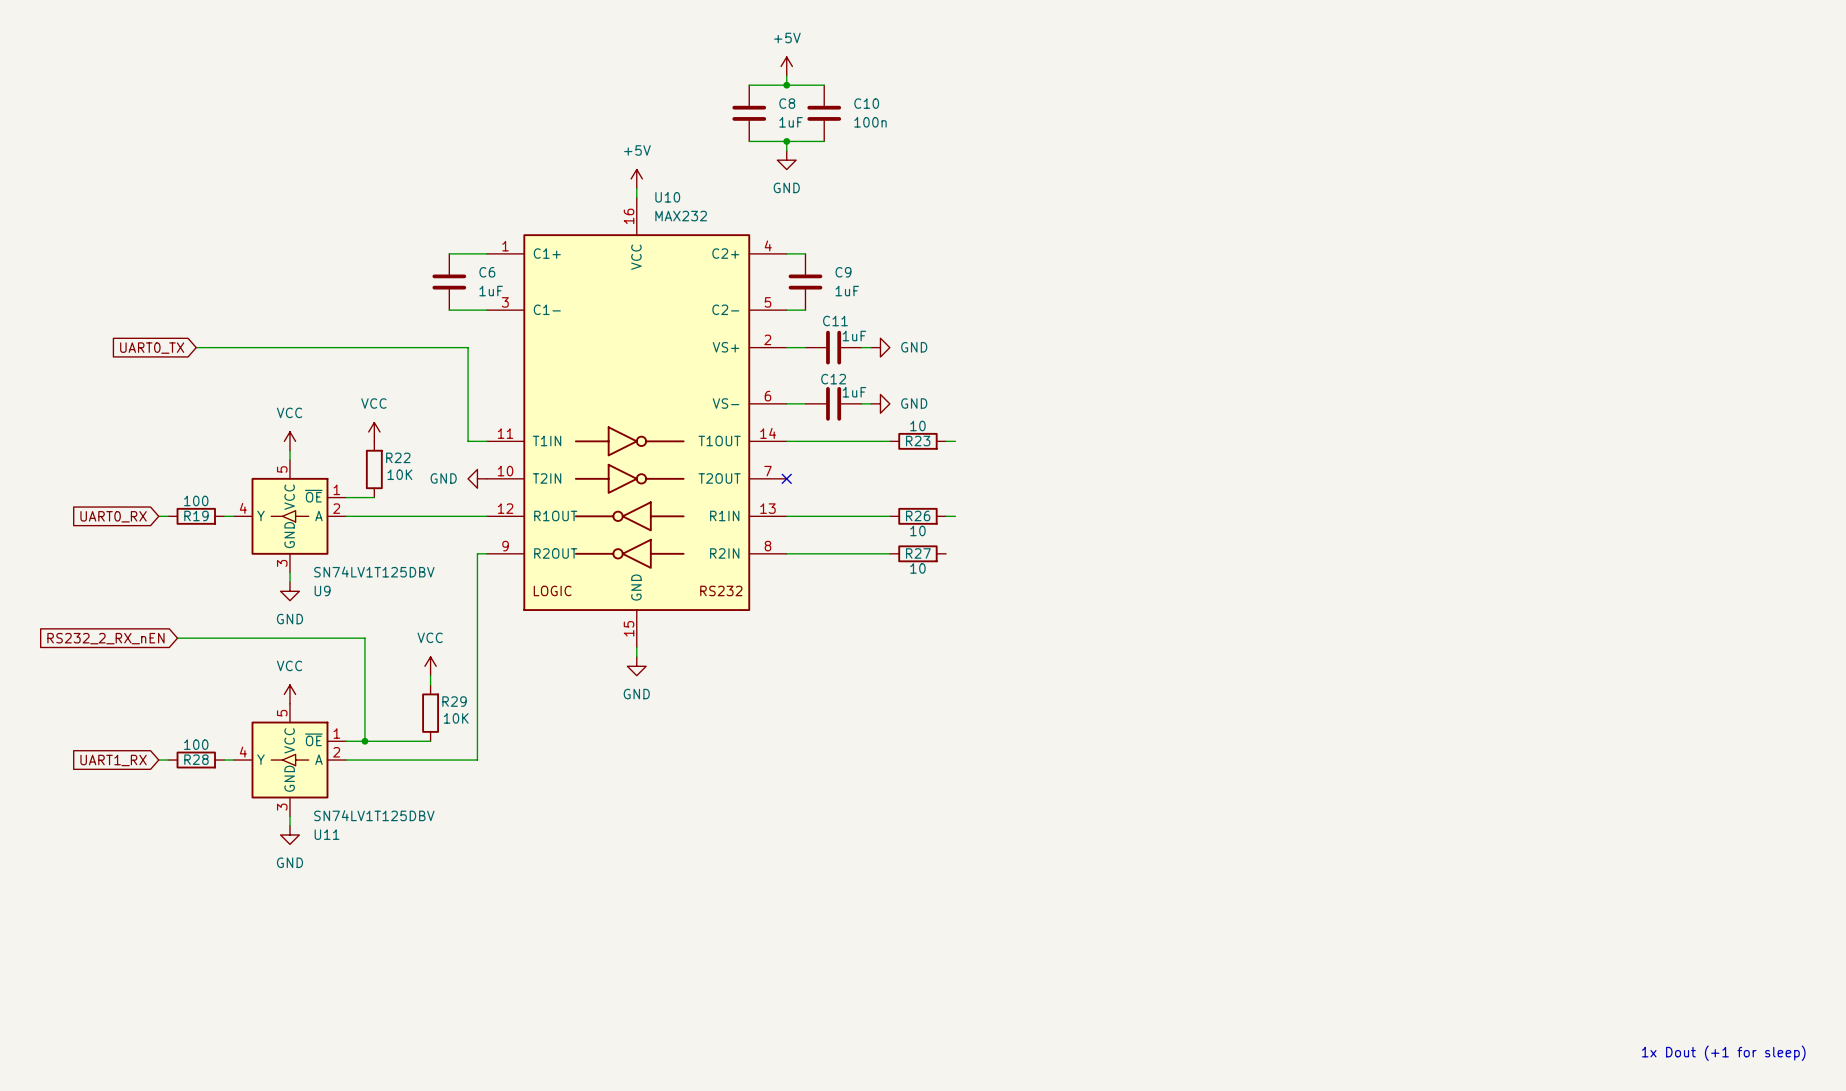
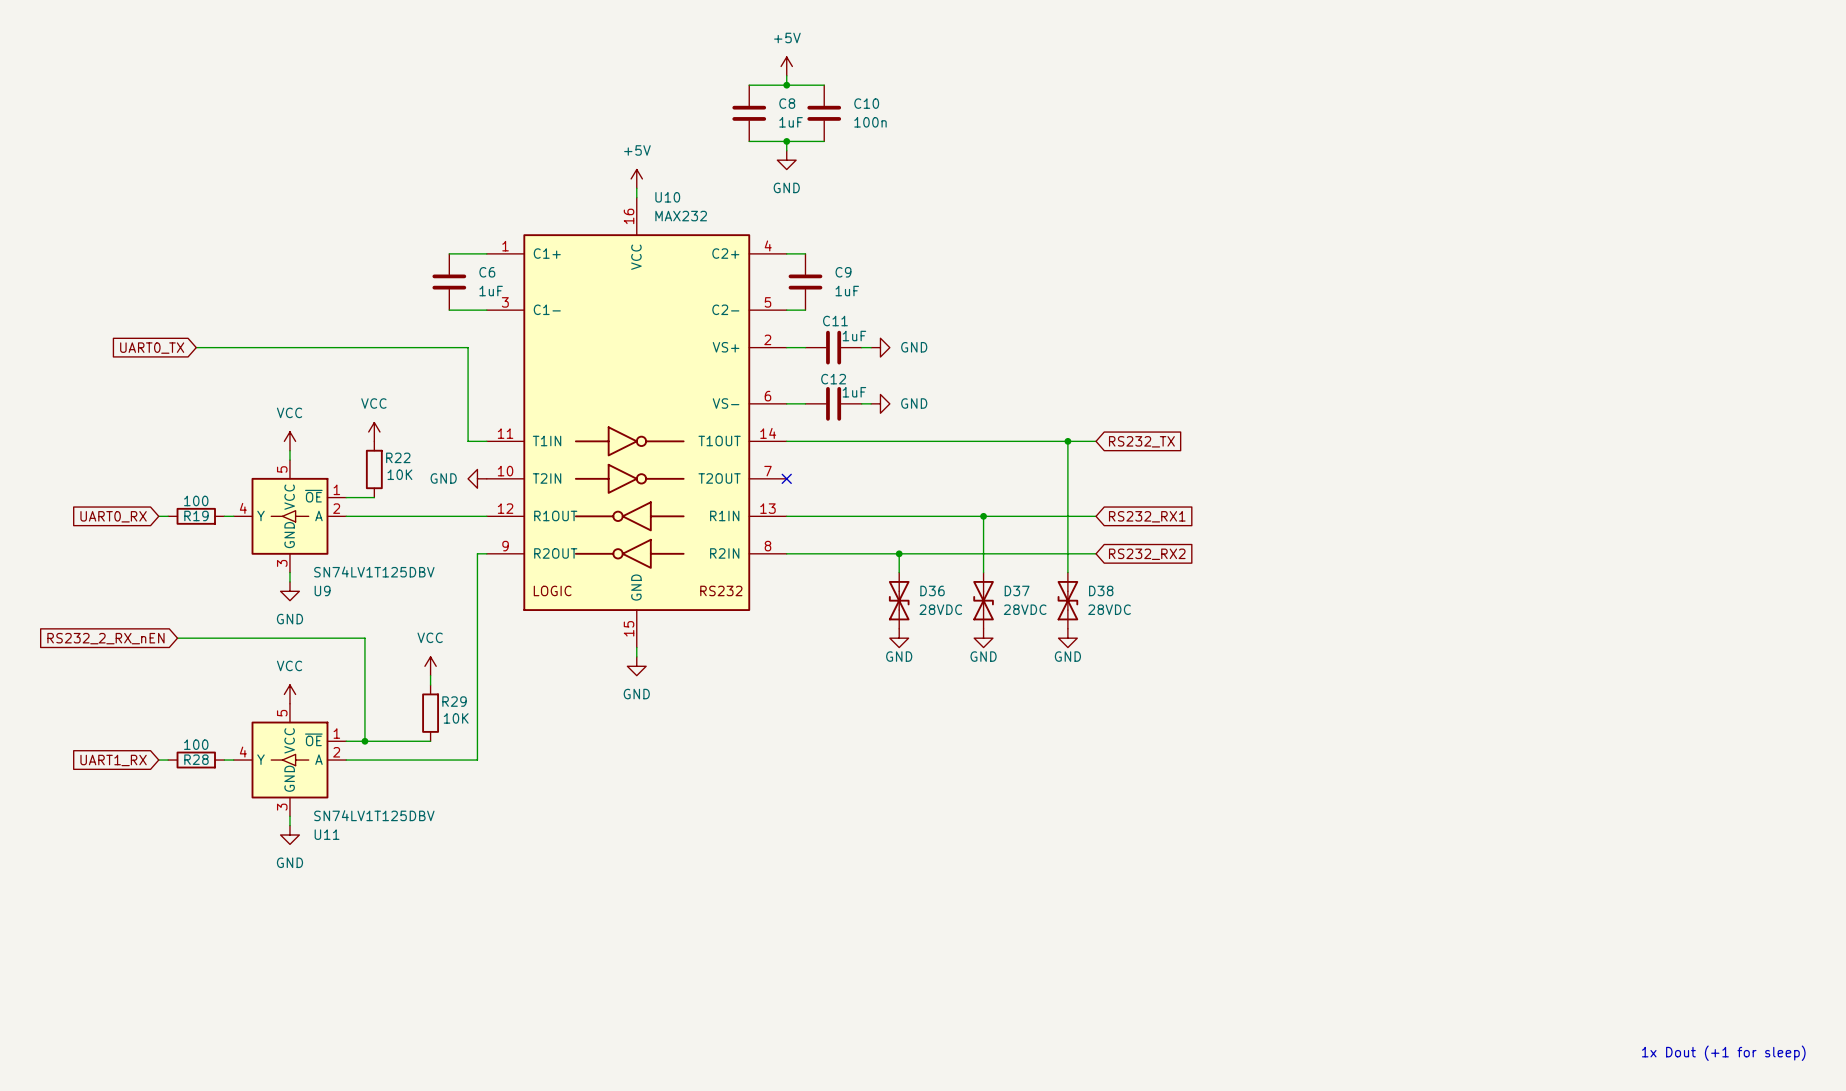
R23: 10 (917, 441) -> none
wire: none -> (955, 441) (1096, 441)
wire: none -> (1067, 441) (1067, 572)
junction: none -> (1067, 441)
global label: none -> RS232_TX (1141, 441)
R26: 10 (917, 516) -> none
wire: none -> (955, 516) (1096, 516)
wire: none -> (983, 516) (983, 572)
junction: none -> (983, 516)
global label: none -> RS232_RX1 (1147, 516)
wire: none -> (889, 553) (1096, 553)
wire: none -> (899, 553) (899, 572)
junction: none -> (899, 553)
R27: 10 (917, 553) -> none
global label: none -> RS232_RX2 (1147, 554)
D36: none -> 28VDC (899, 600)
D37: none -> 28VDC (983, 600)
D38: none -> 28VDC (1067, 600)
power symbol: none -> GND (899, 638)
power symbol: none -> GND (983, 638)
power symbol: none -> GND (1067, 638)

